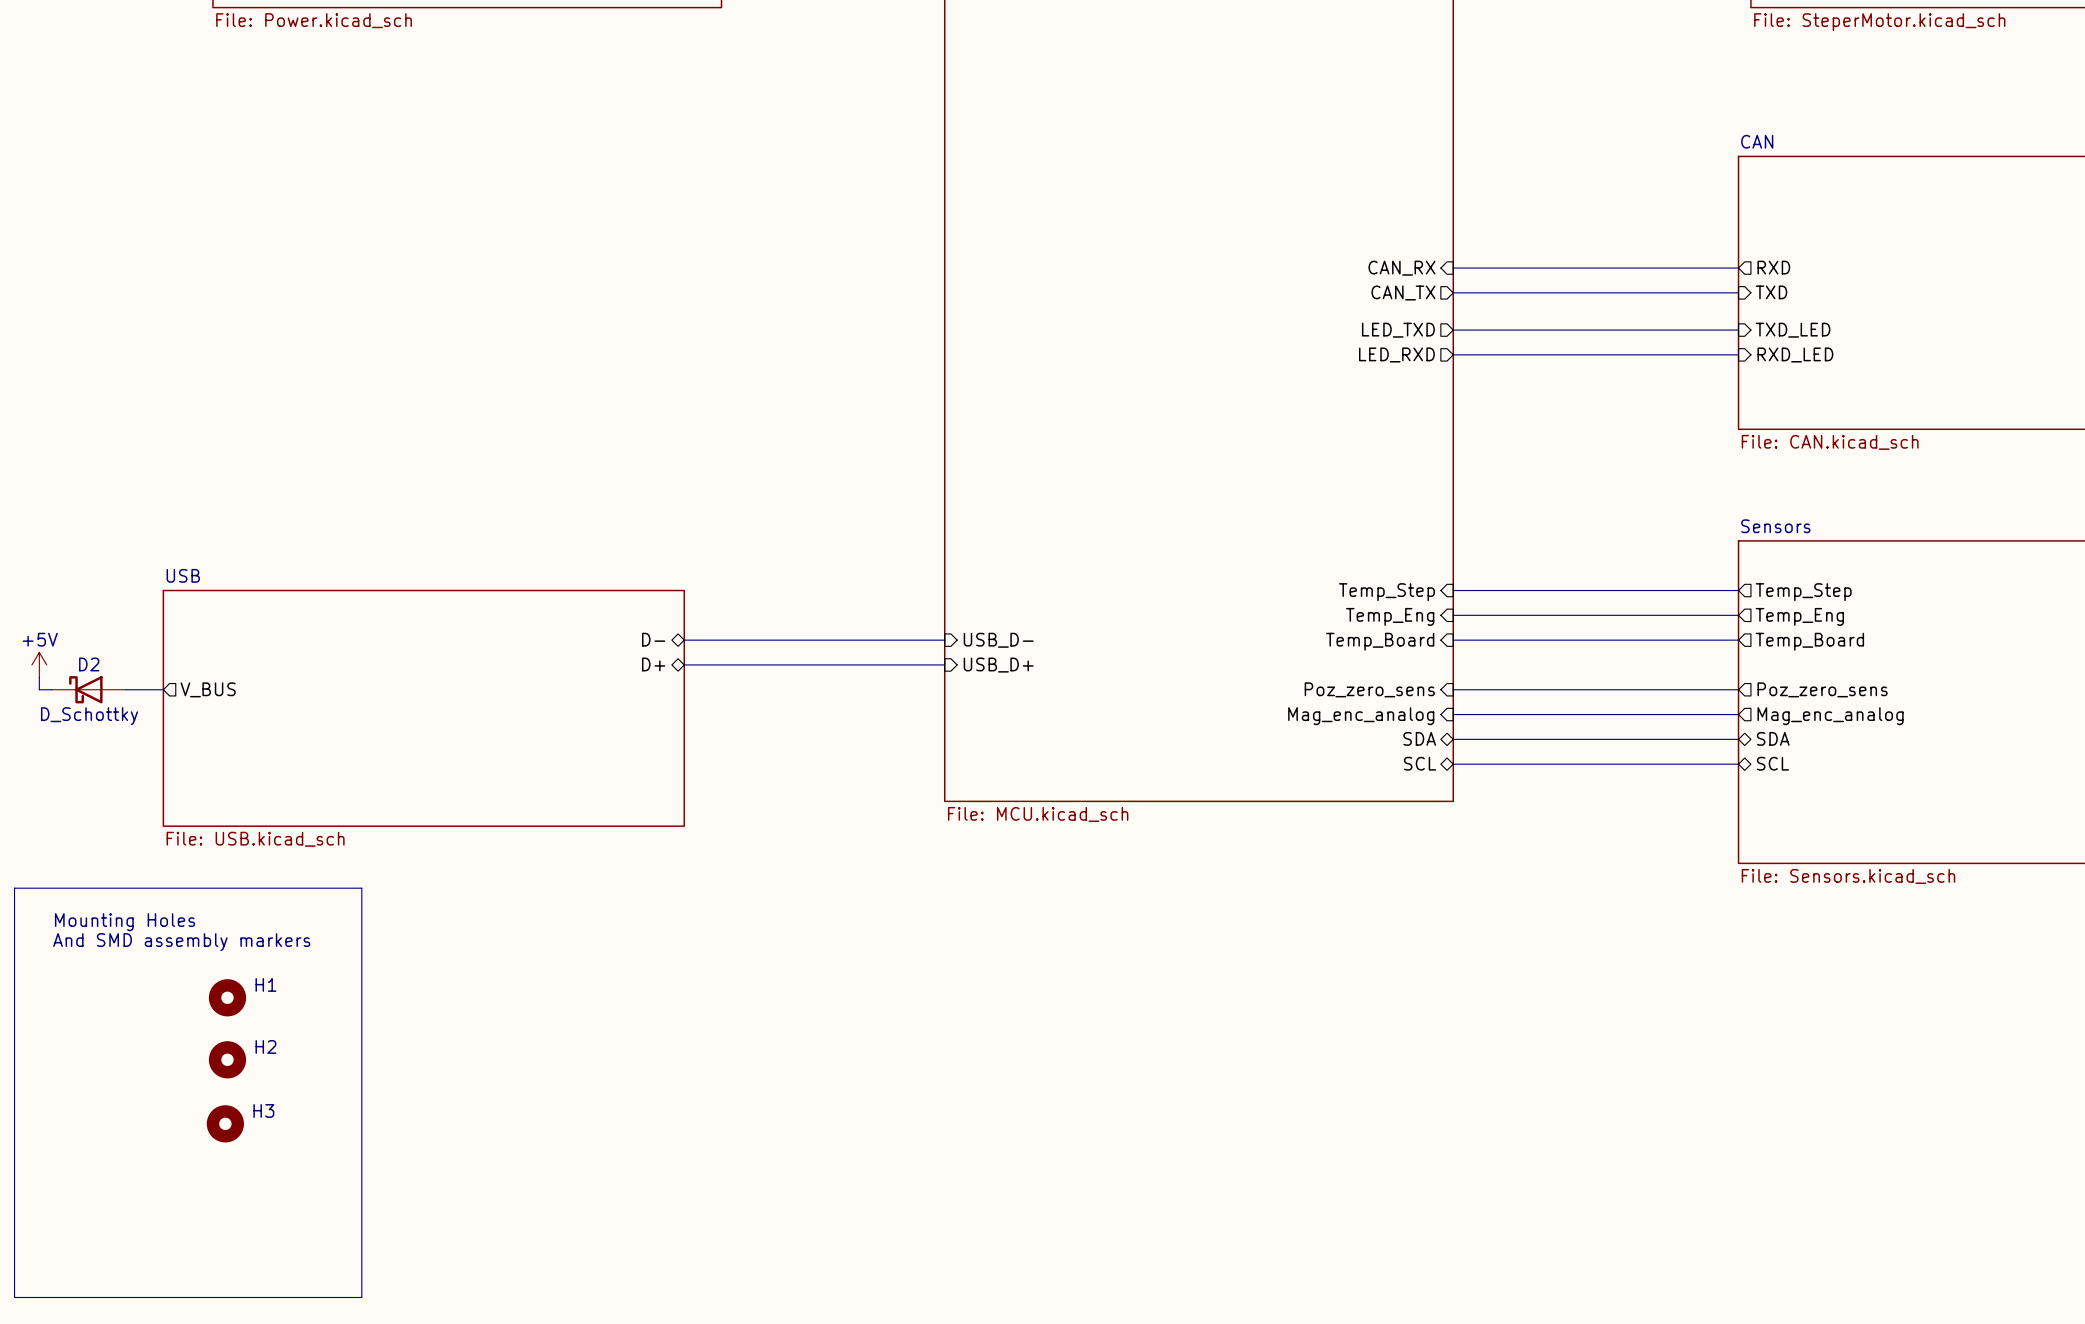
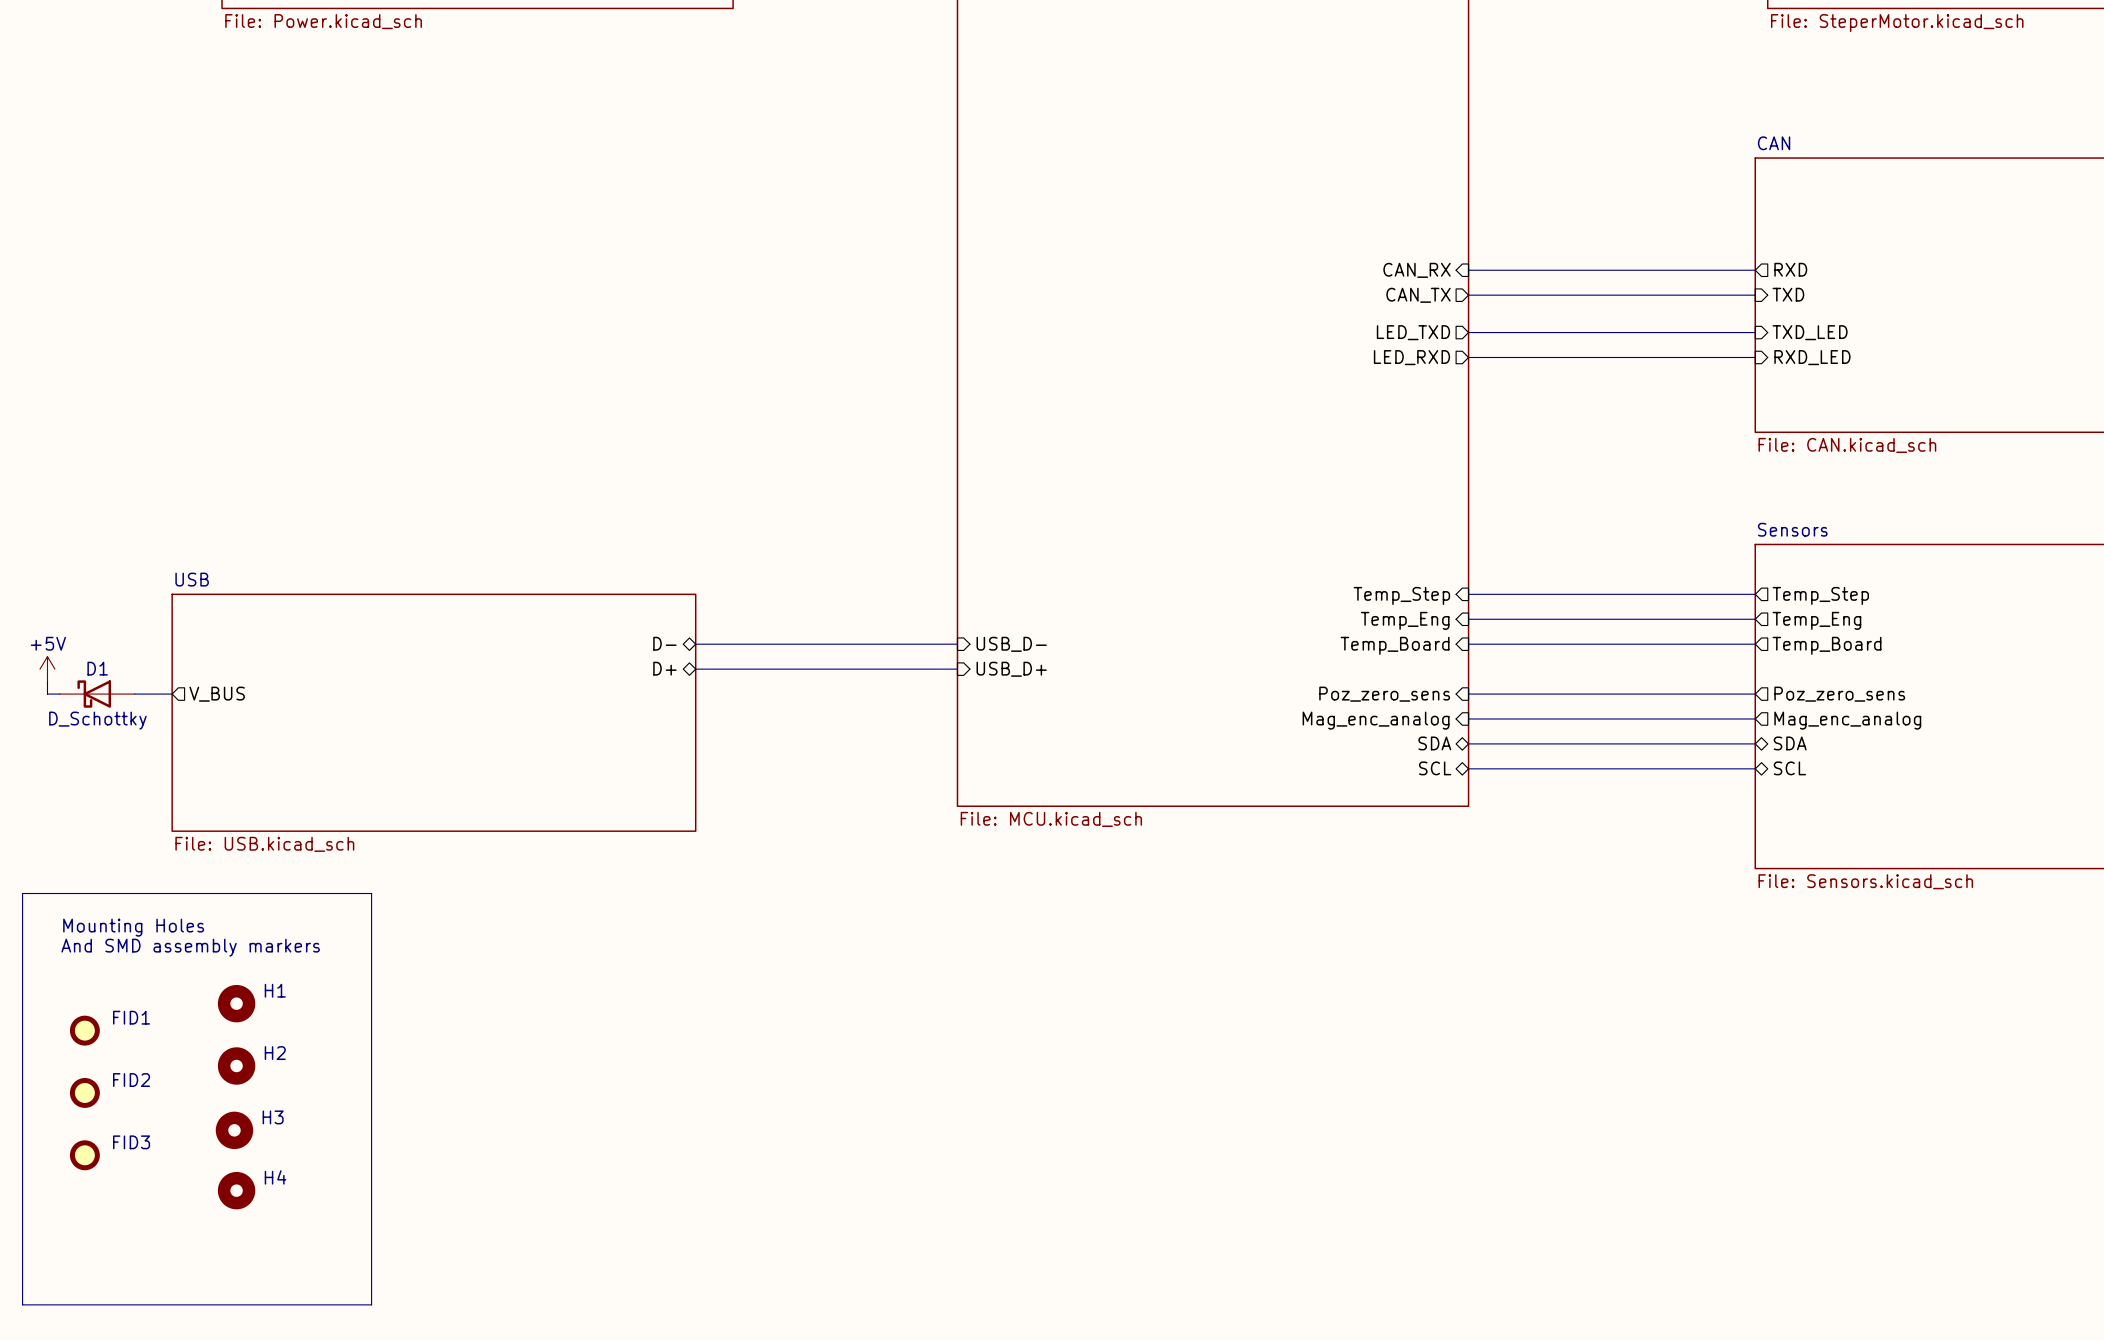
D2 name: D2 (89, 664) -> D1 (97, 668)
FID1: none -> (84, 1030)
FID2: none -> (84, 1092)
FID3: none -> (84, 1155)
H4: none -> (236, 1190)

